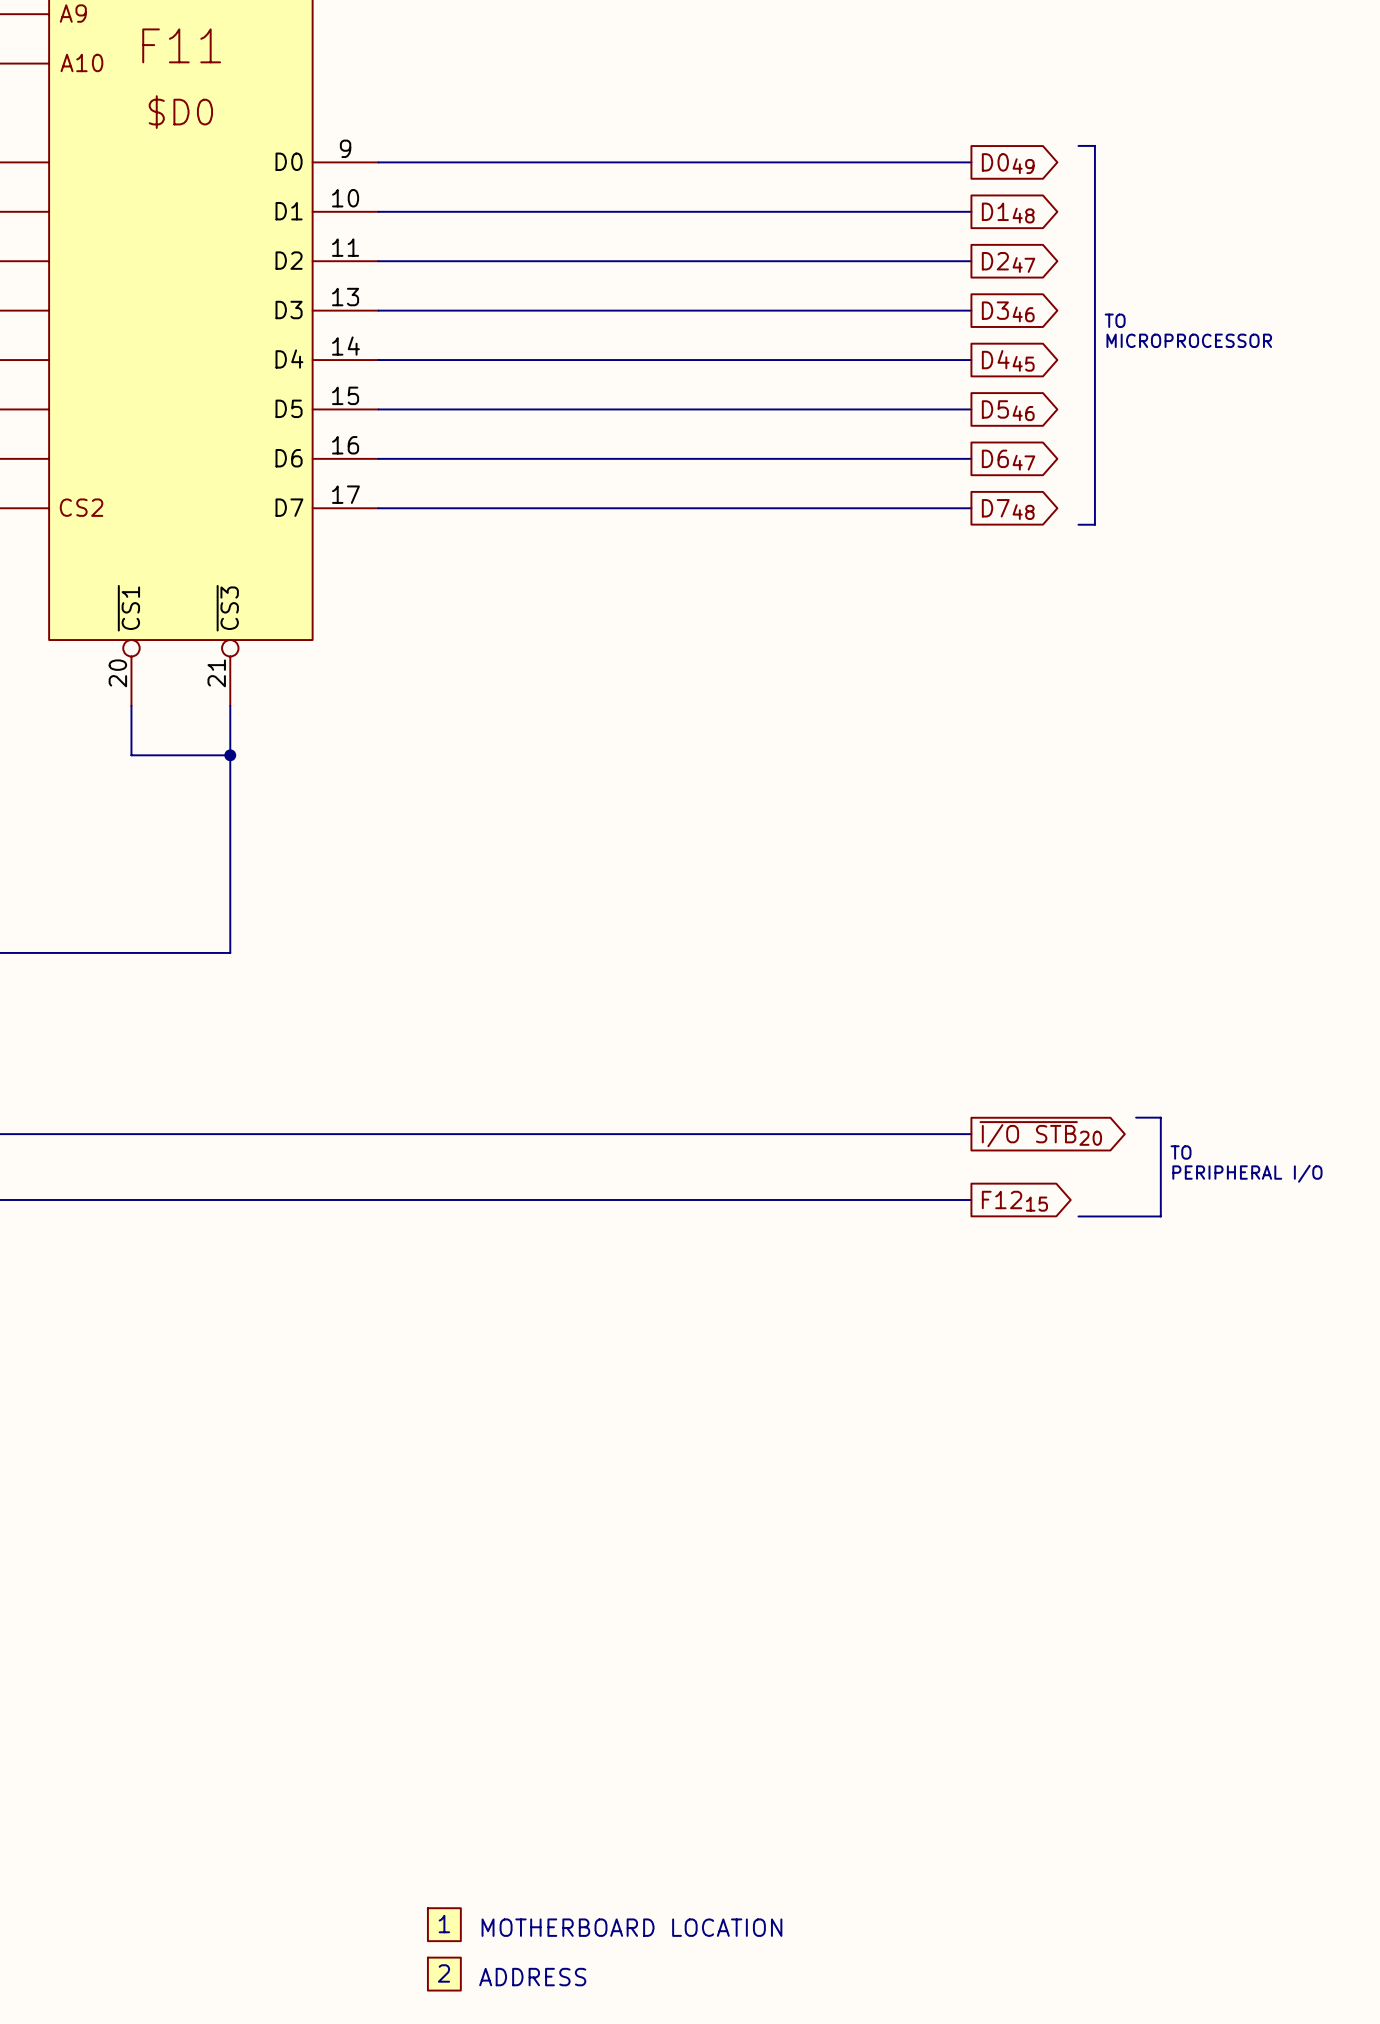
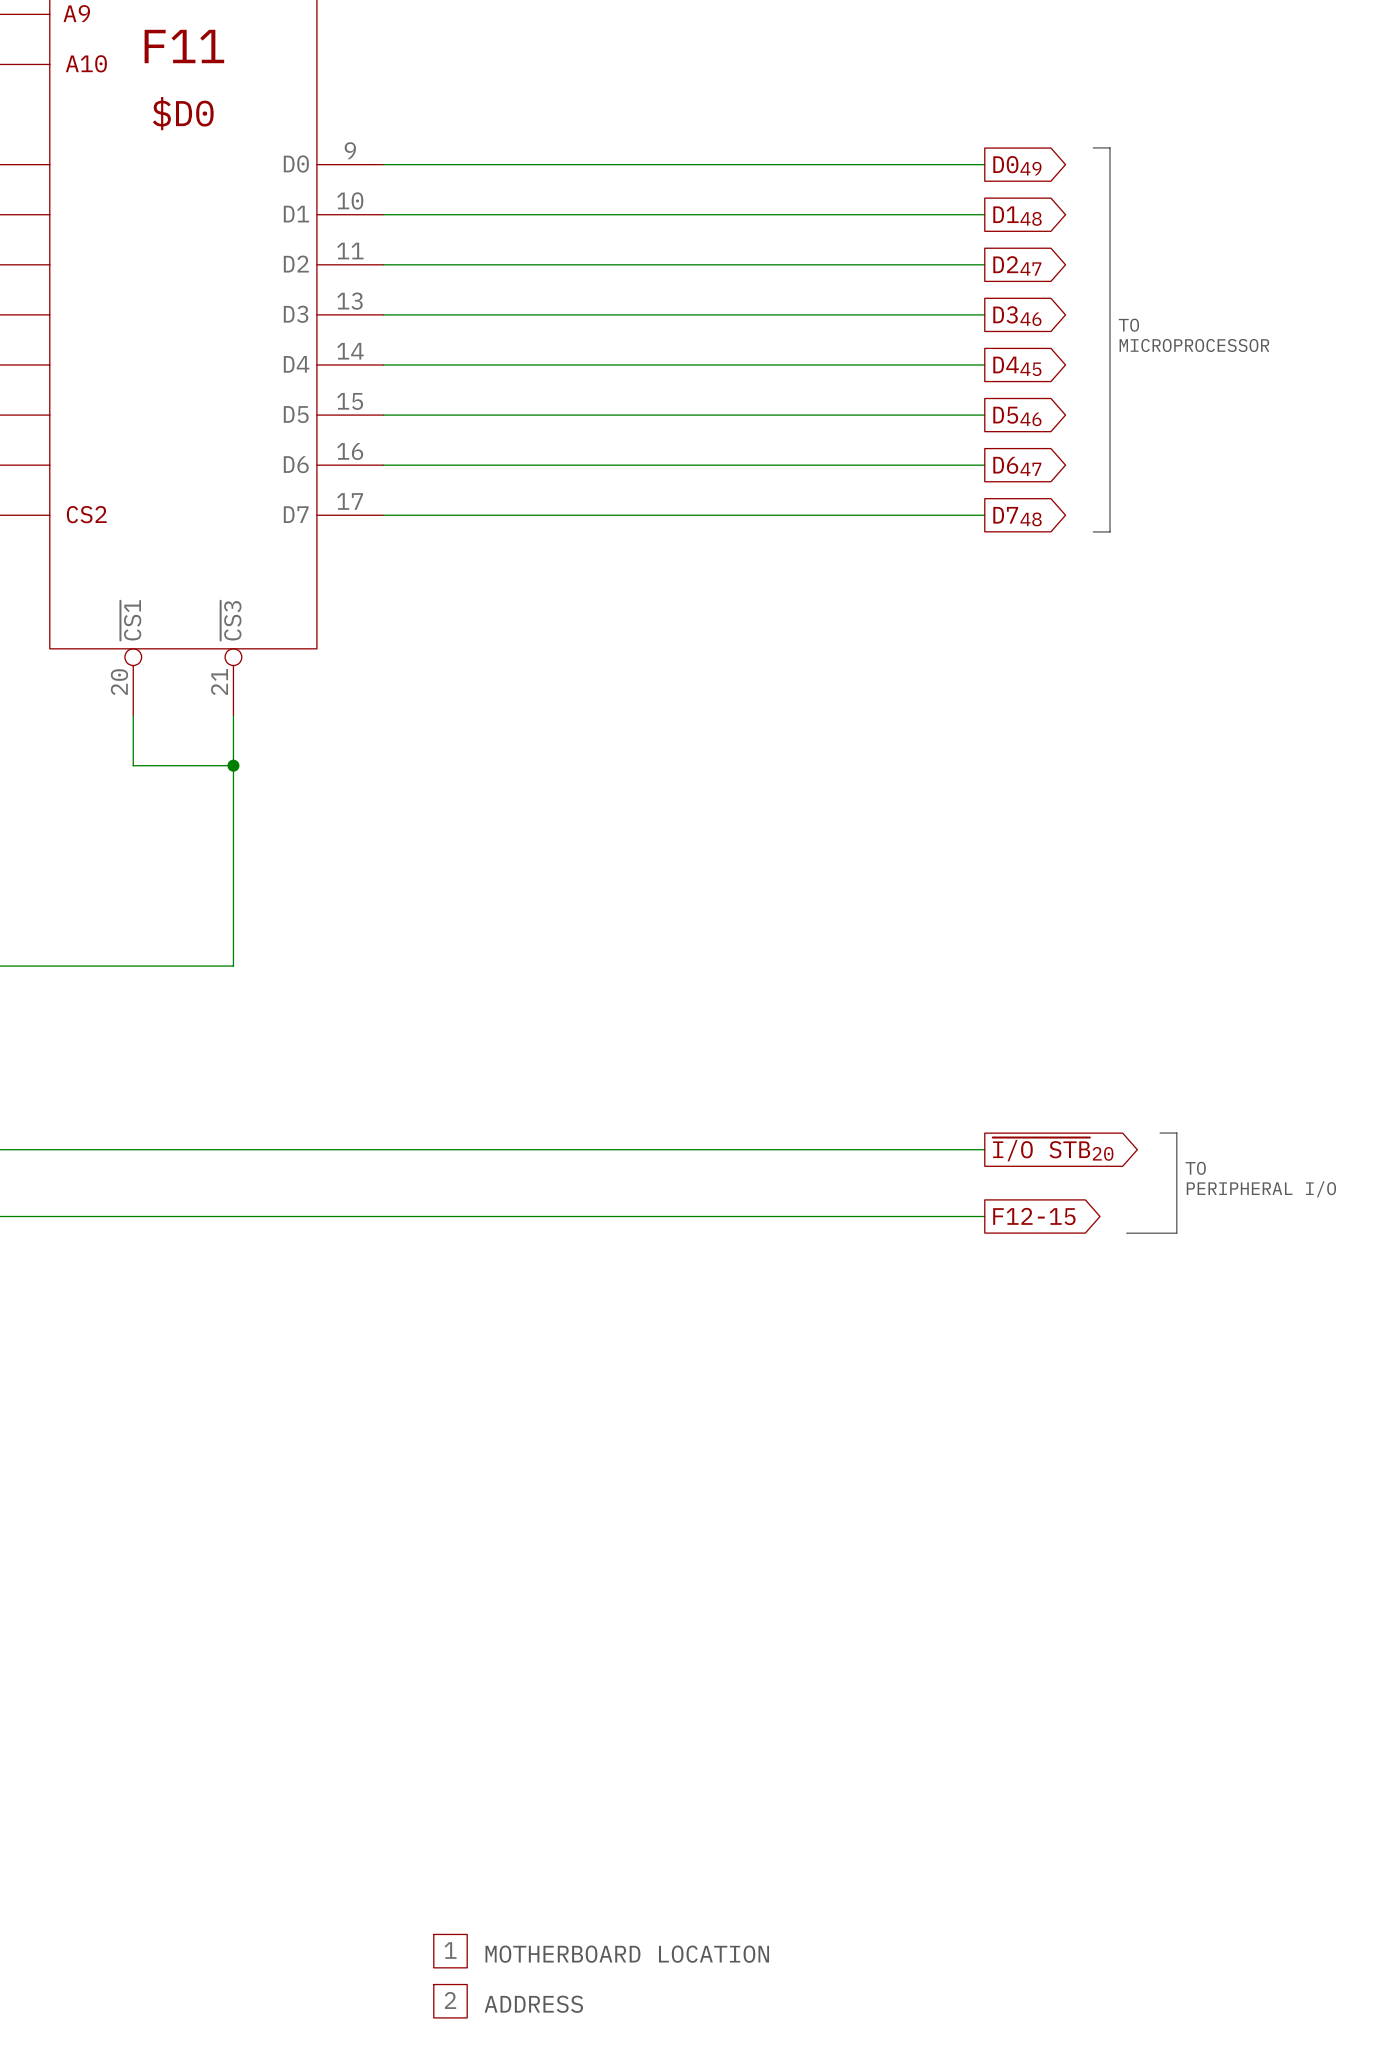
line: (1136, 1117) (1144, 1117) -> none
global label: F1215 (1014, 1201) -> F12-15 (1034, 1216)
line: (1078, 1216) (1111, 1216) -> none

